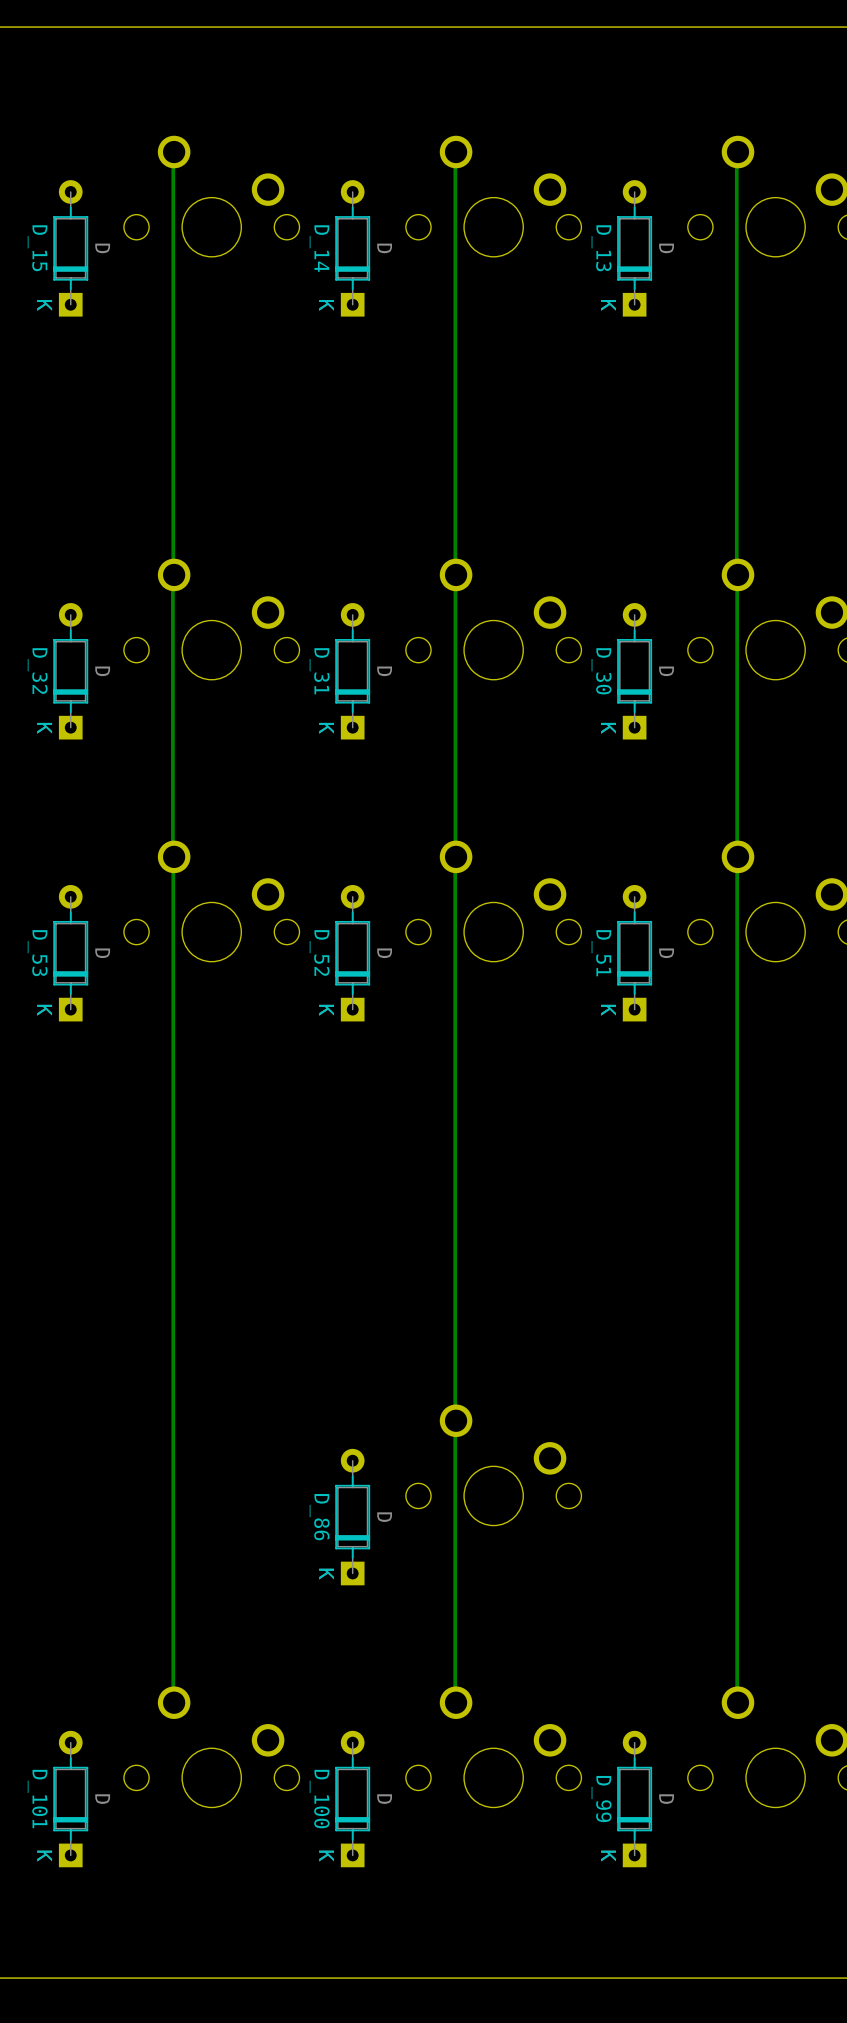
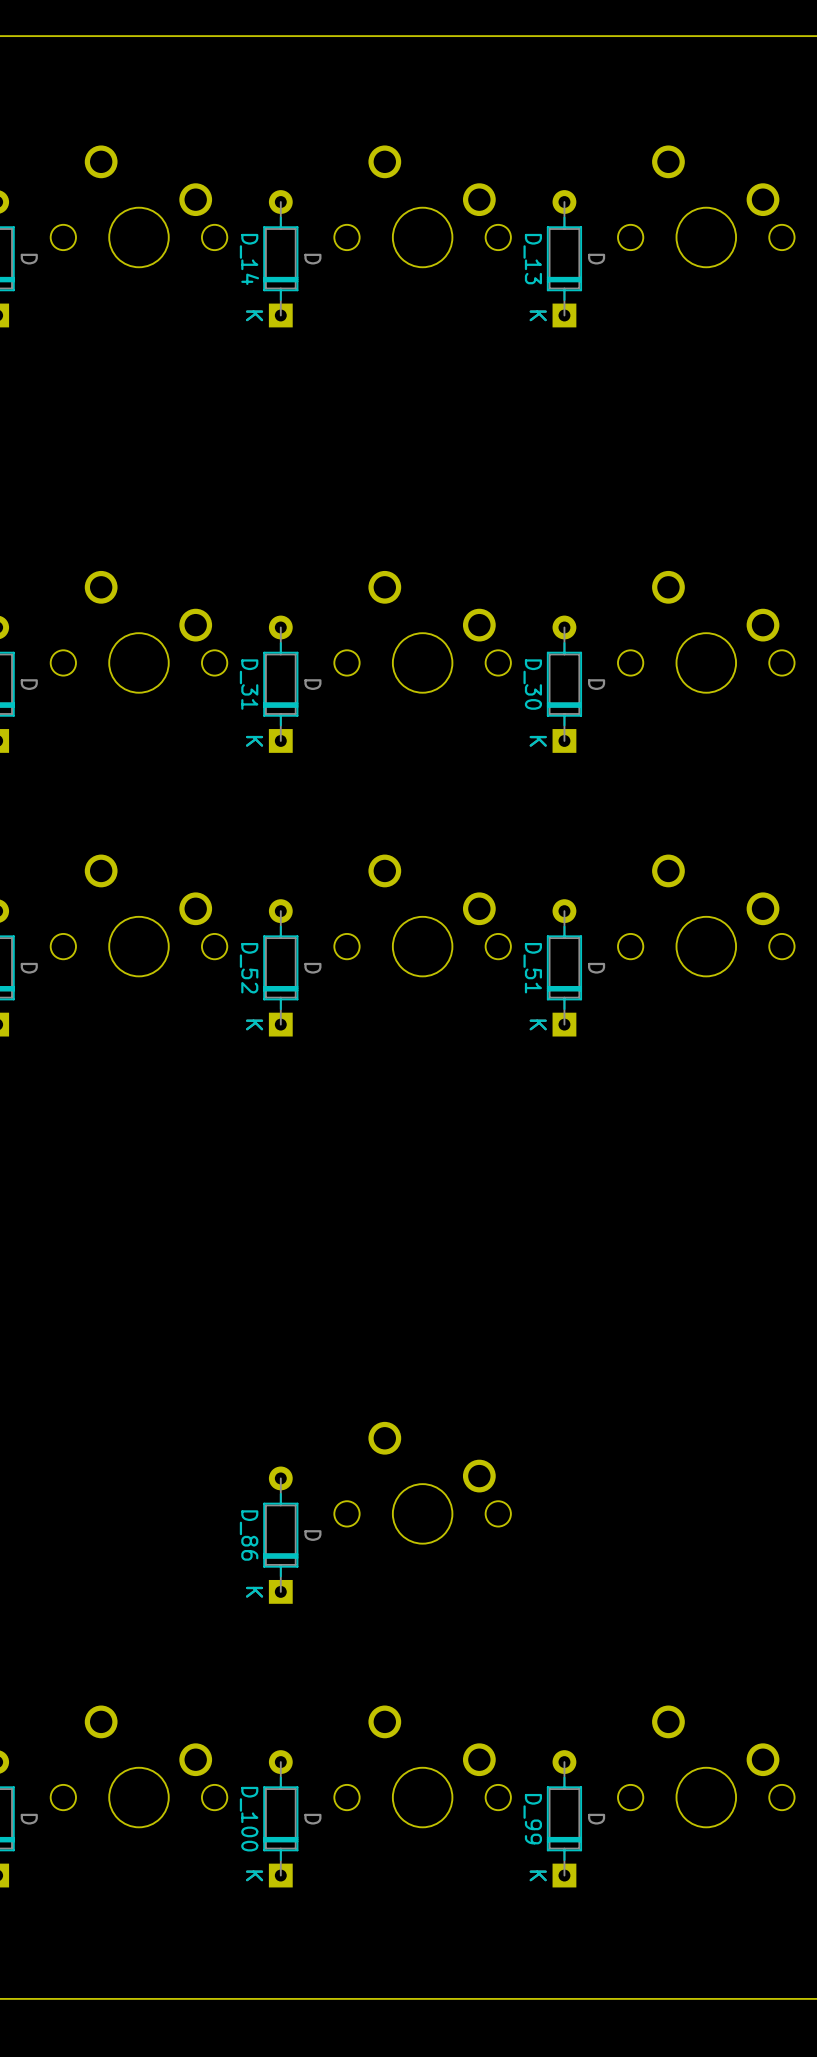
track: (174, 152) (174, 1702) -> none
track: (456, 152) (456, 1702) -> none
track: (738, 152) (738, 1702) -> none

